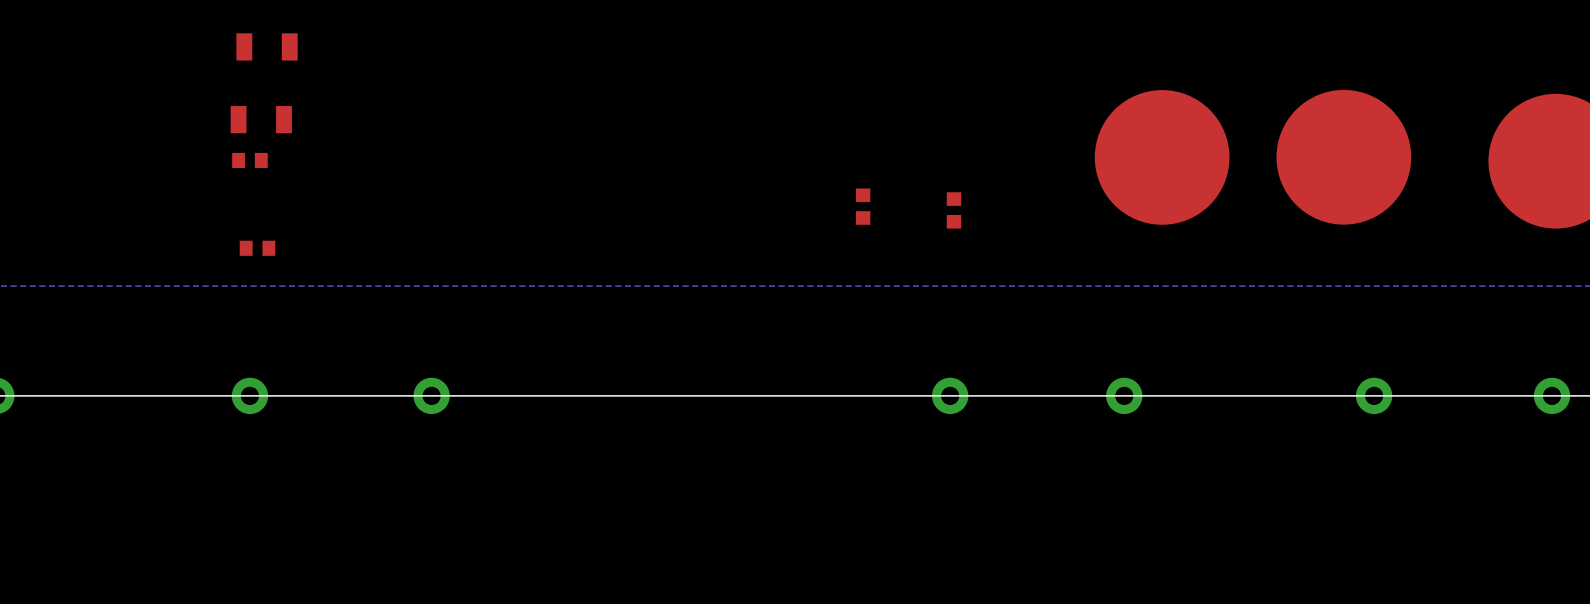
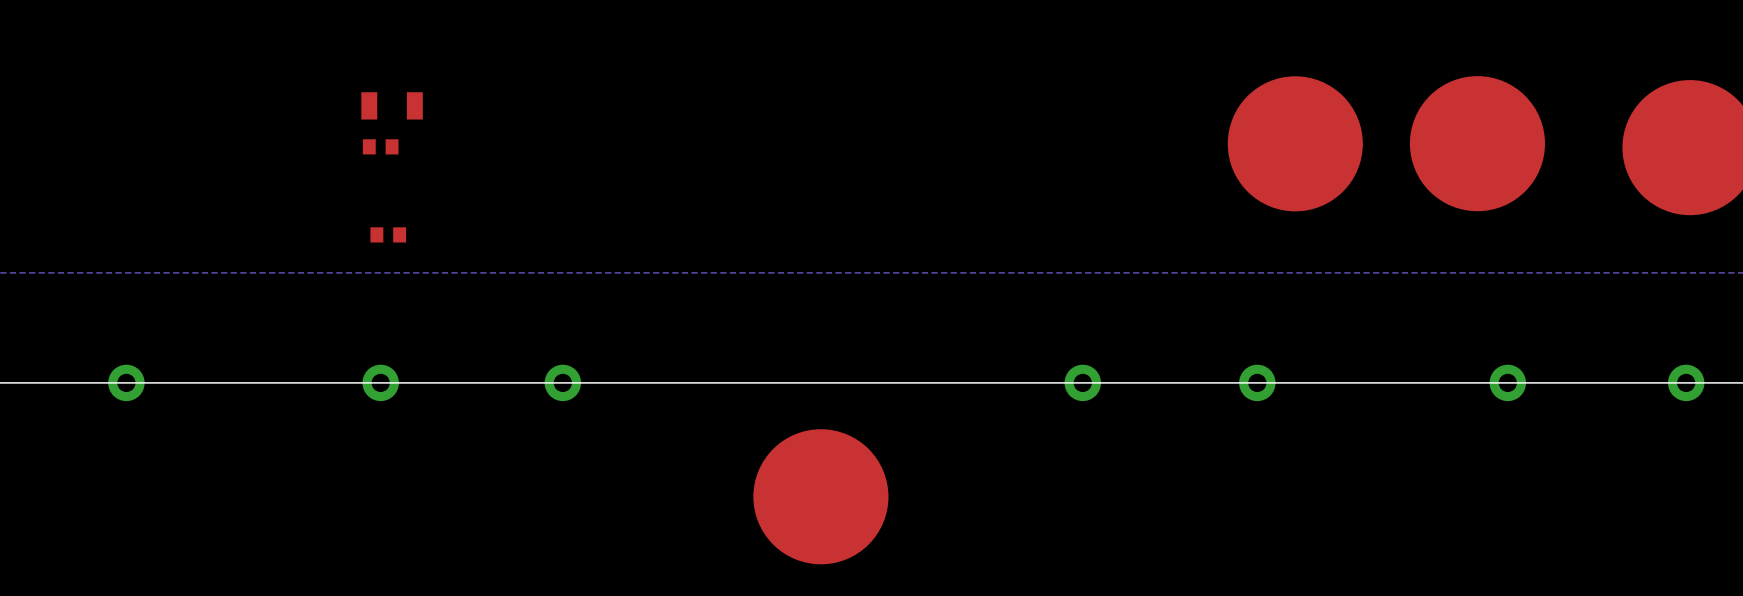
part: (267, 46) -> none
part: (863, 206) -> none
part: (953, 210) -> none
part: none -> (820, 496)

